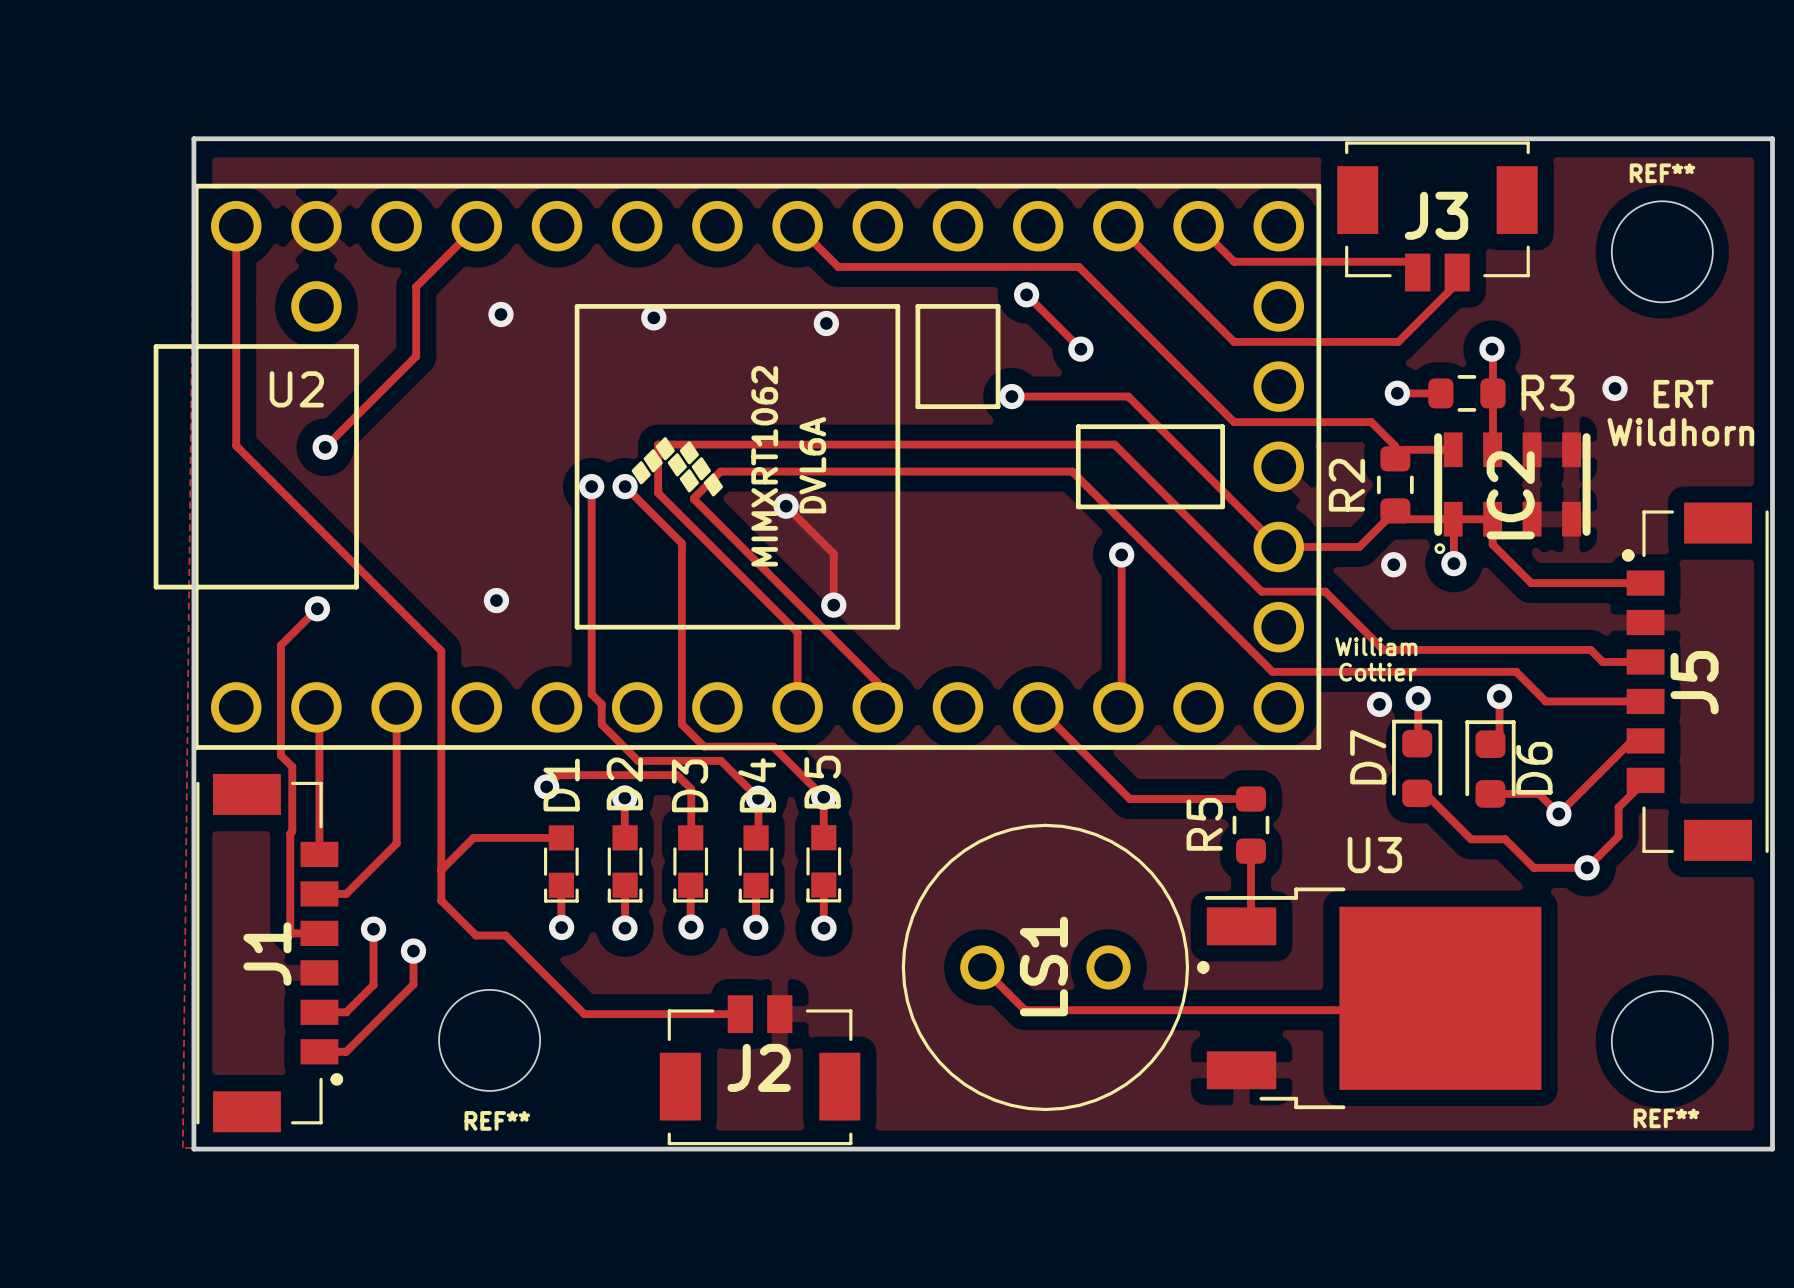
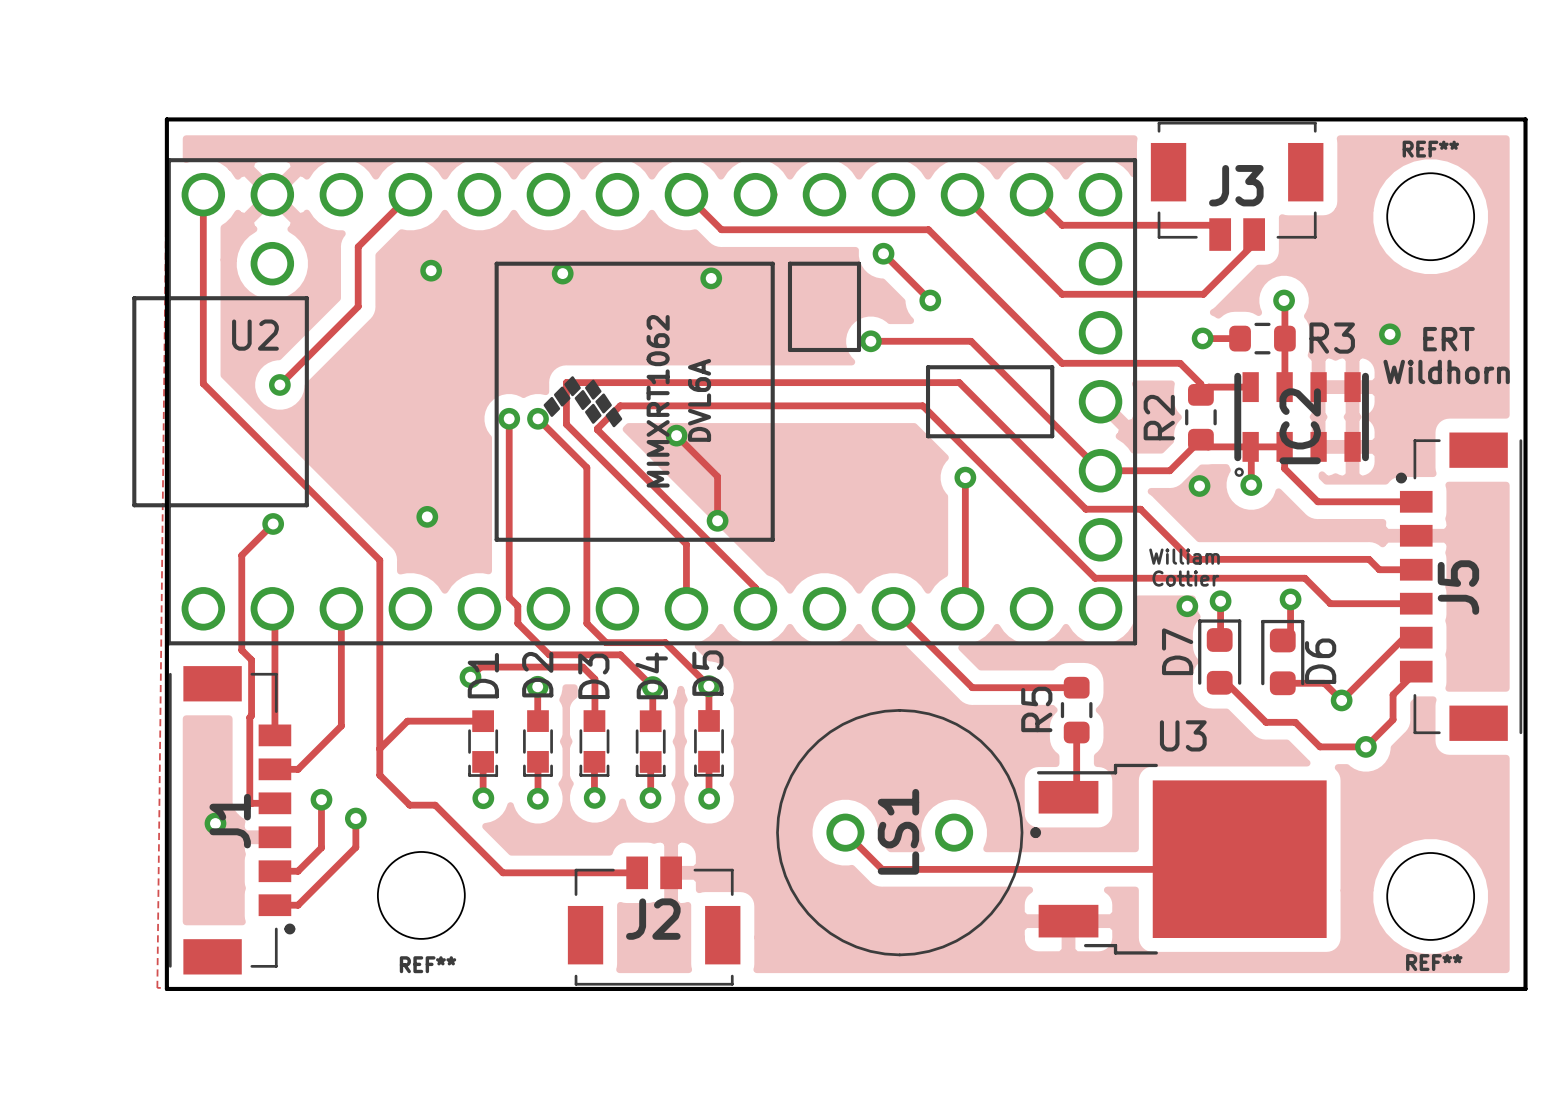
via: none -> (215, 823)

